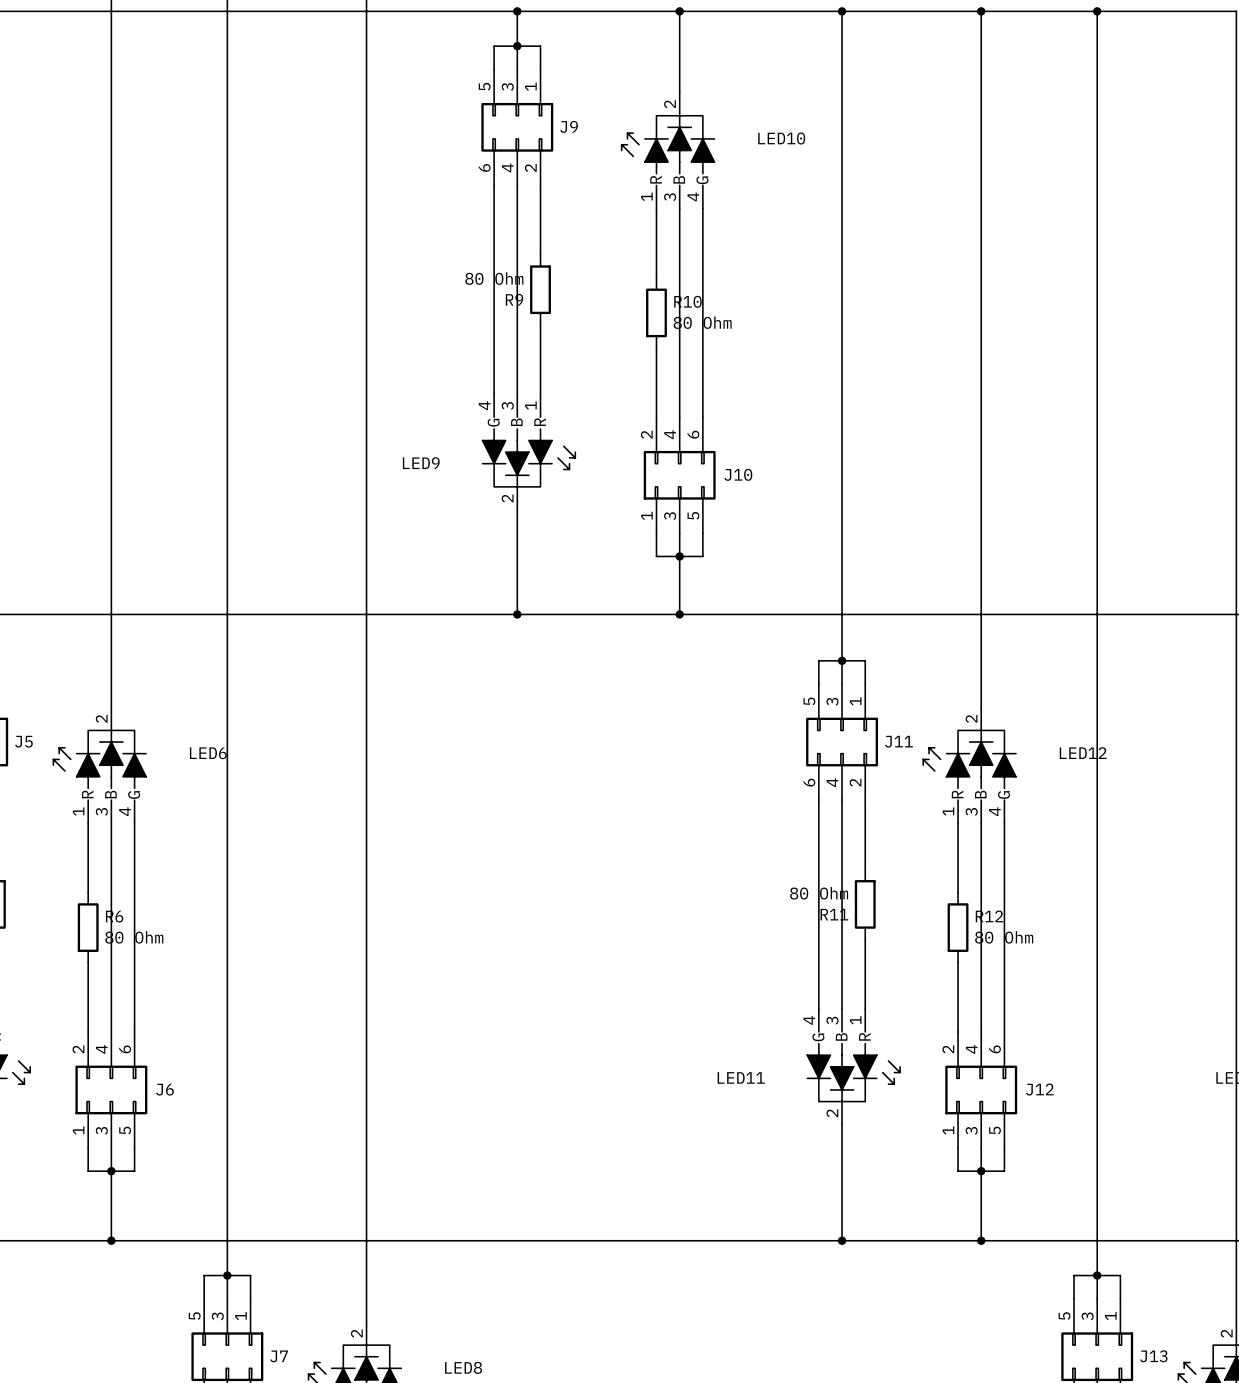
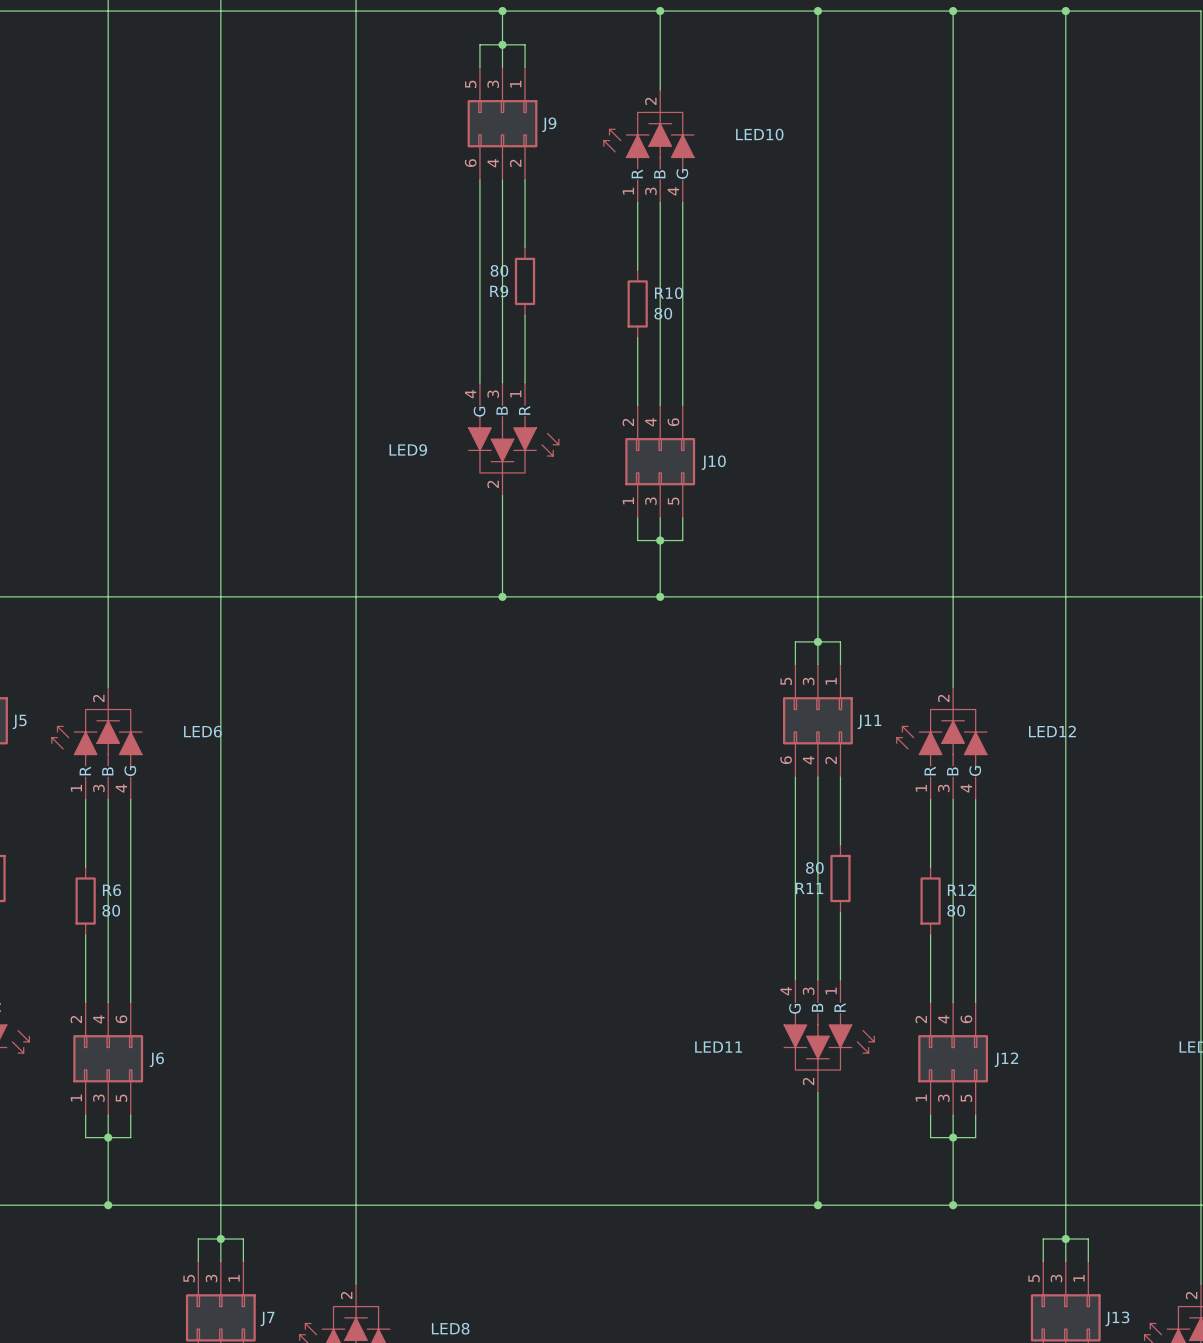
R9 value: 80 Ohm (494, 278) -> 80 (499, 270)
R10 value: 80 Ohm (702, 322) -> 80 (663, 313)
R11 value: 80 Ohm (819, 893) -> 80 (814, 867)
R6 value: 80 Ohm (134, 937) -> 80 (111, 910)
R12 value: 80 Ohm (1004, 937) -> 80 (956, 910)

